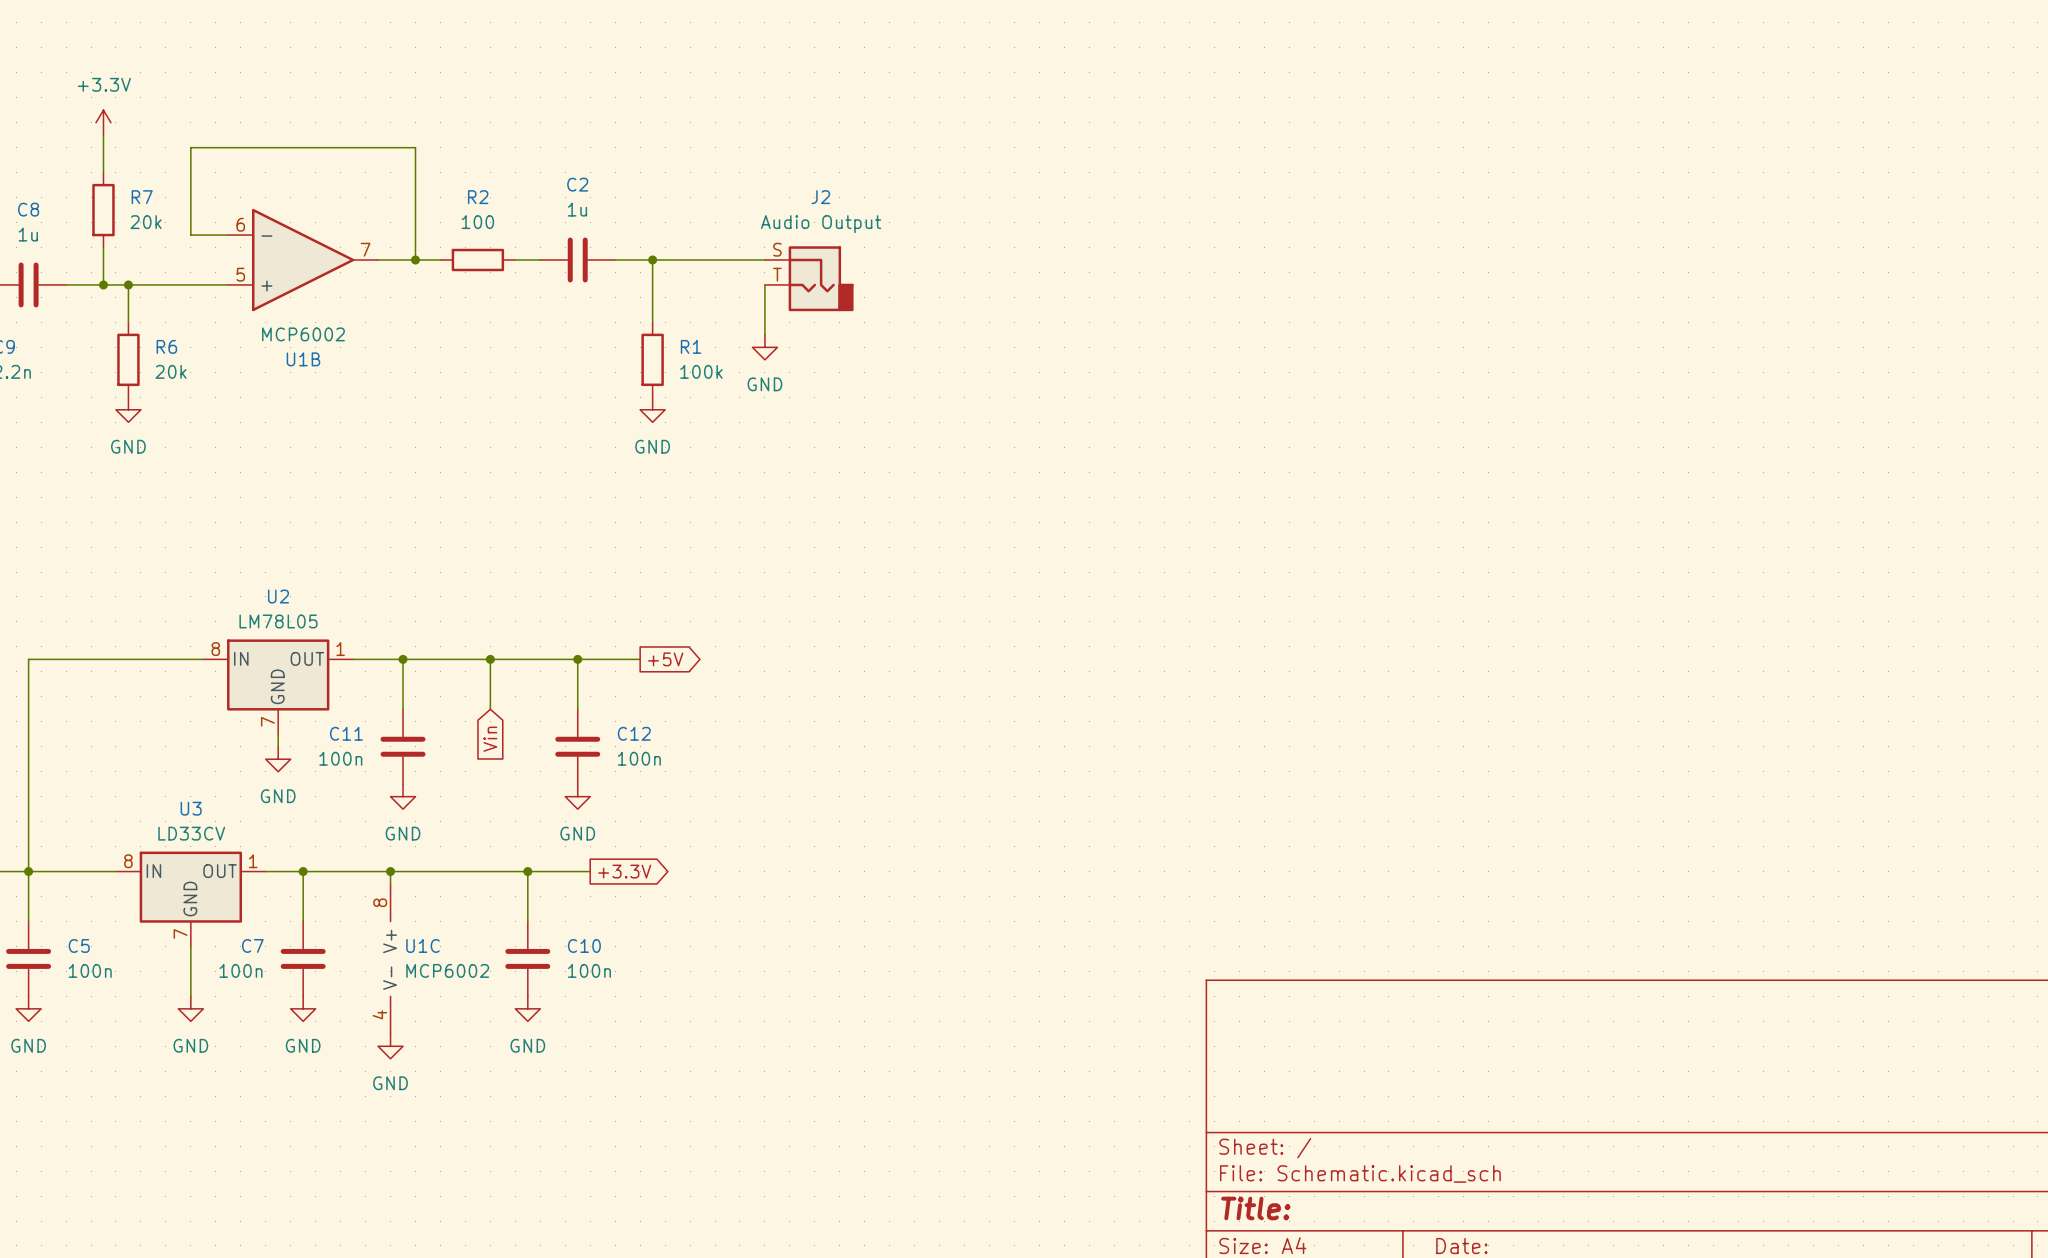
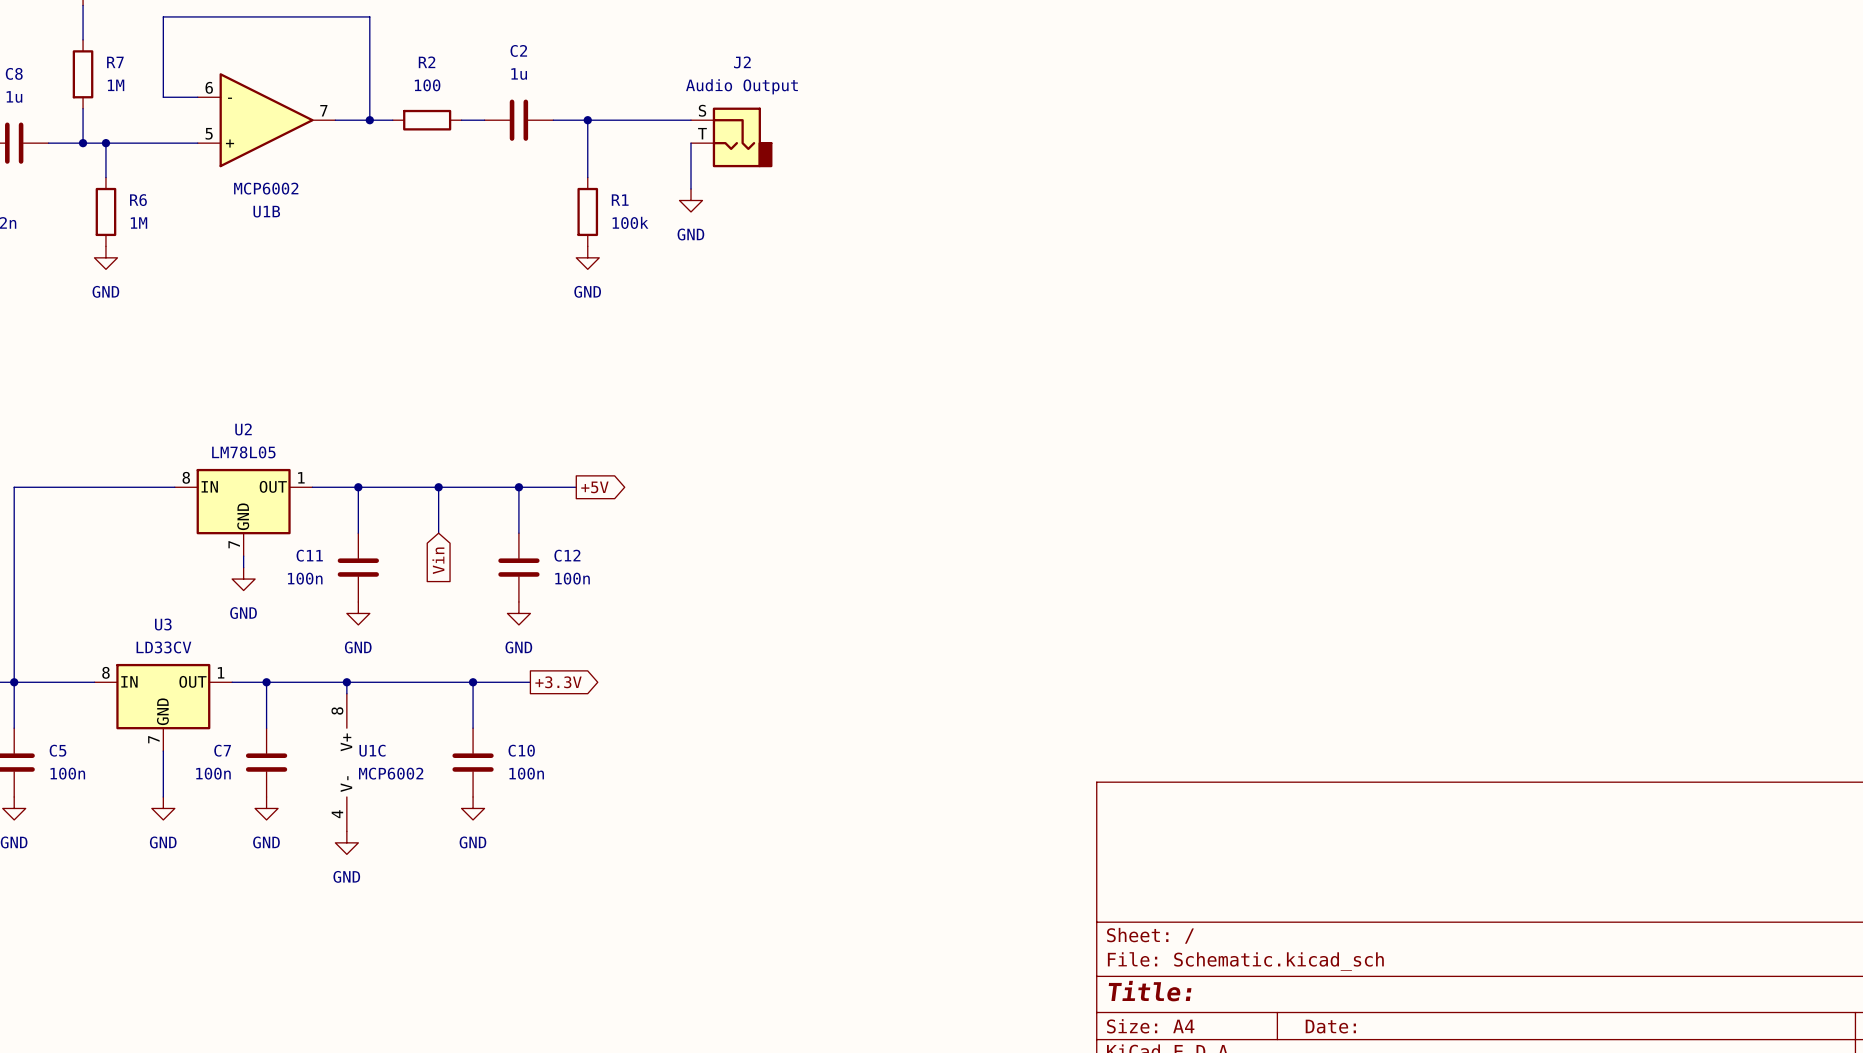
R7 value: 20k (146, 222) -> 1M (116, 85)
R6 value: 20k (171, 371) -> 1M (139, 223)

